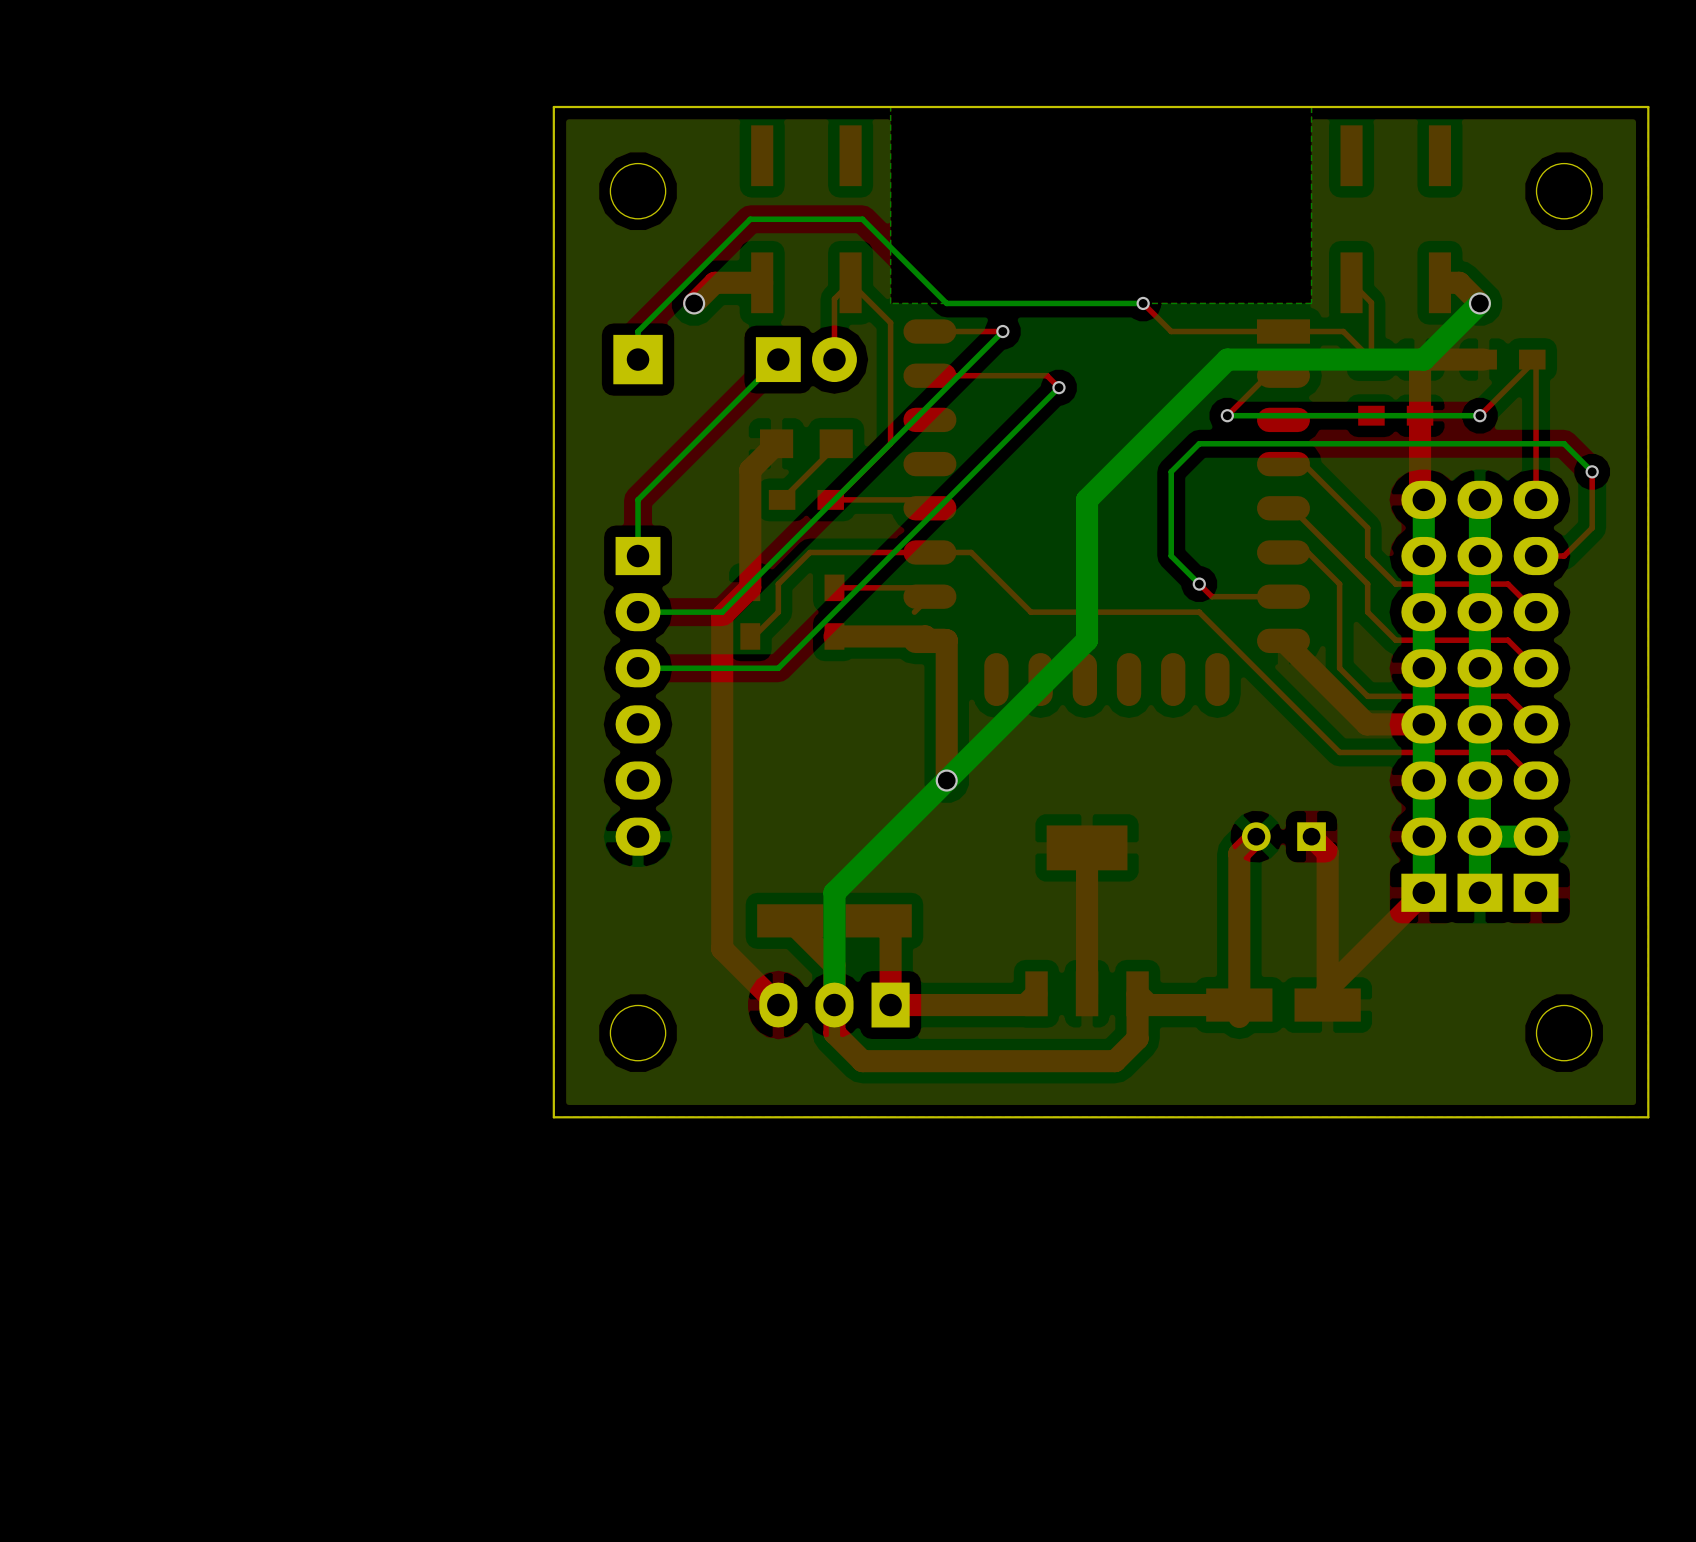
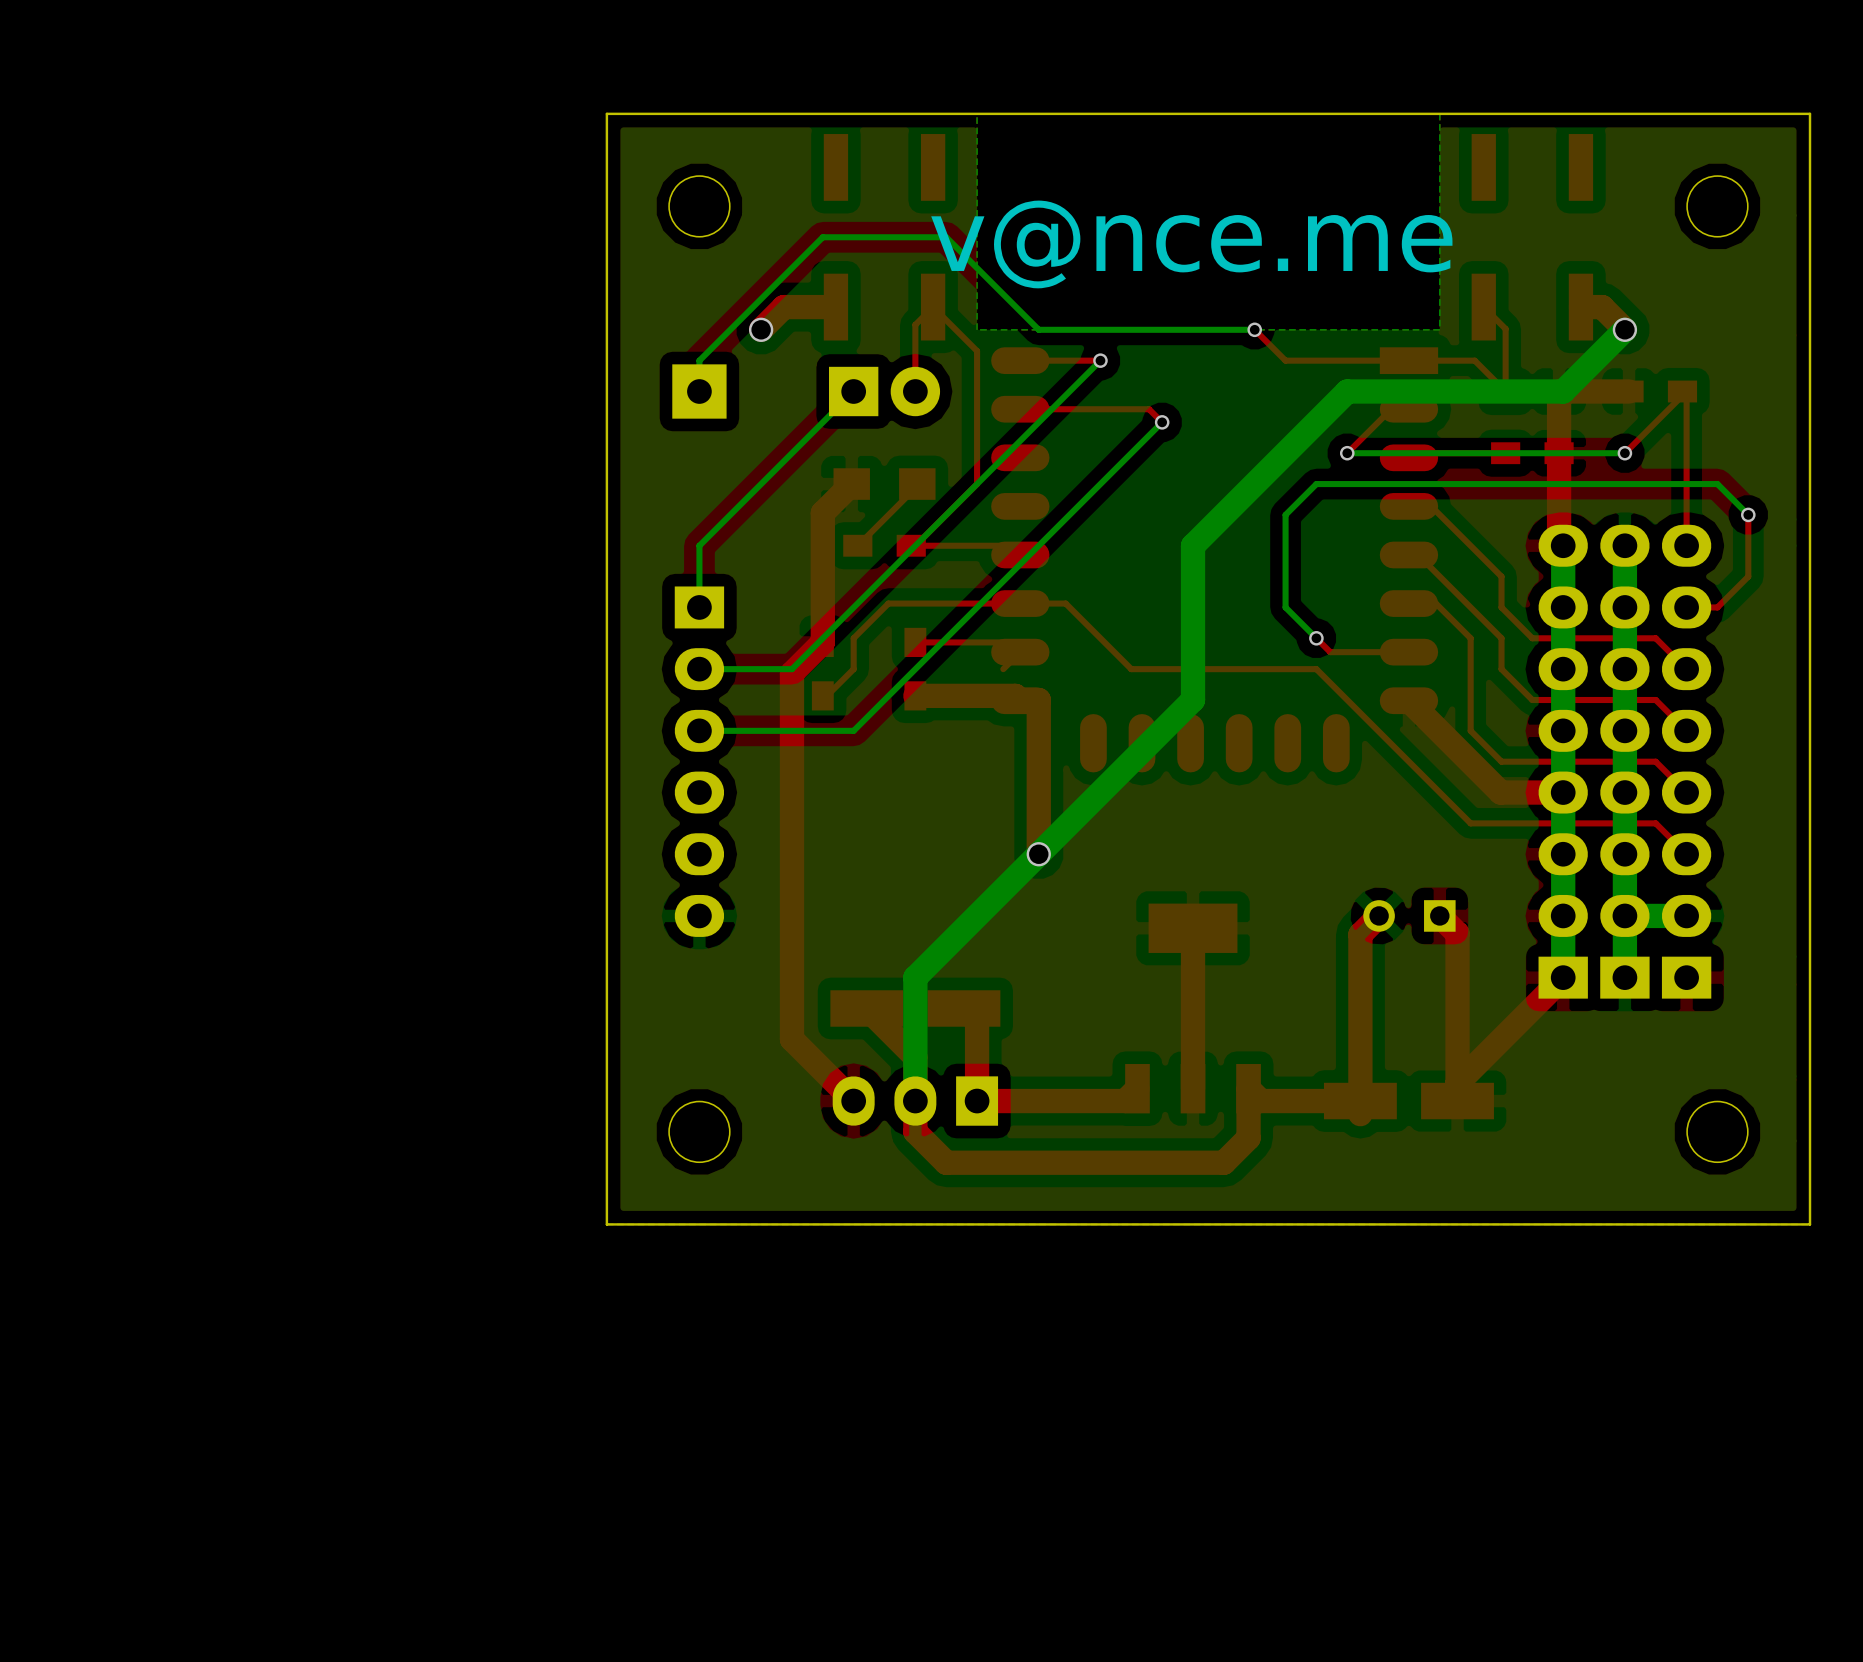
text: none -> v@nce.me (1191, 244)

